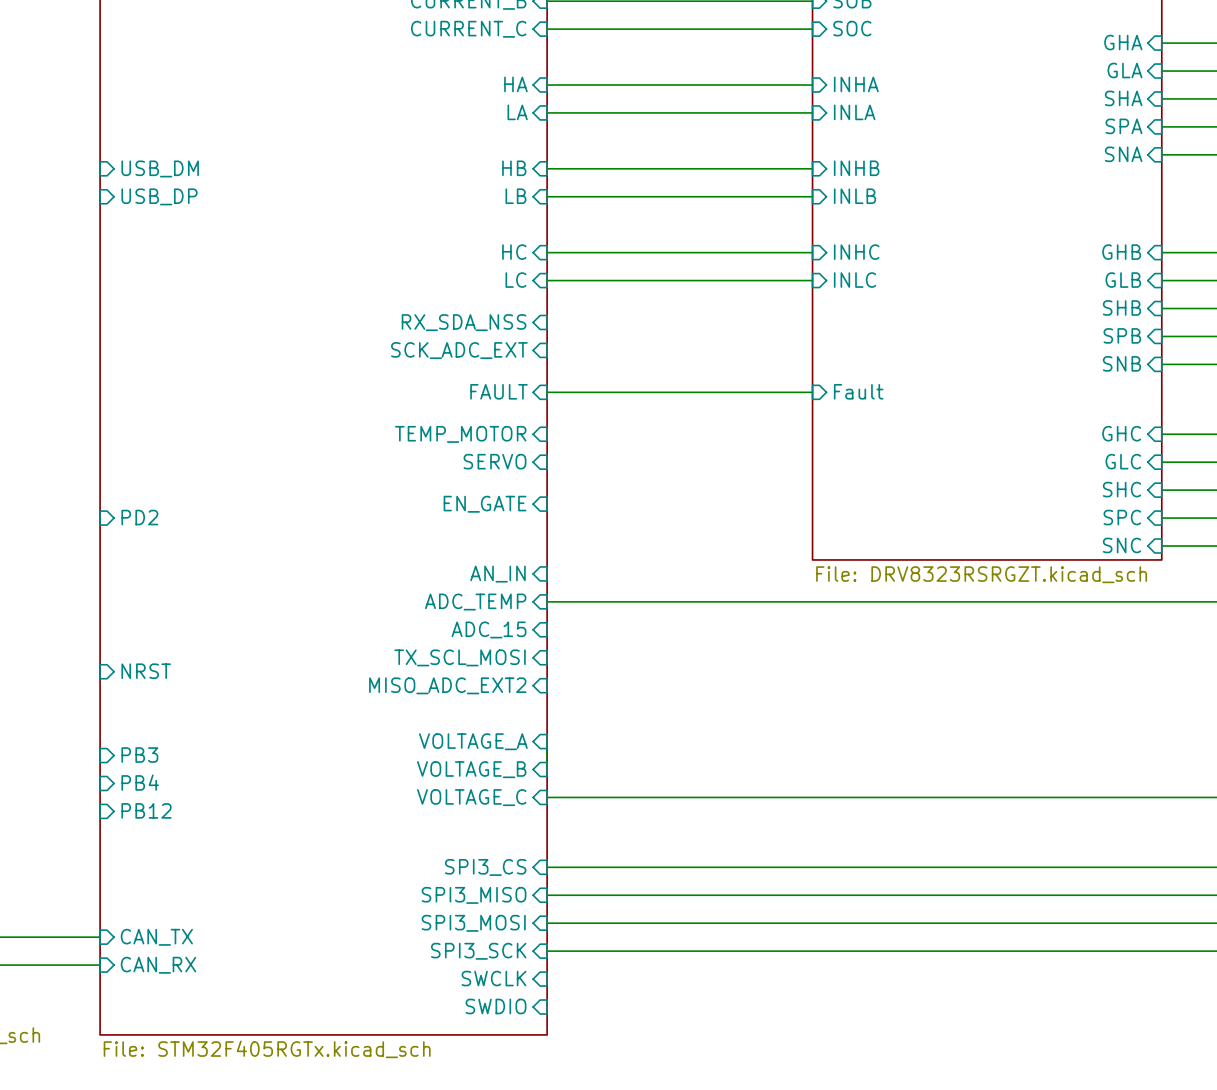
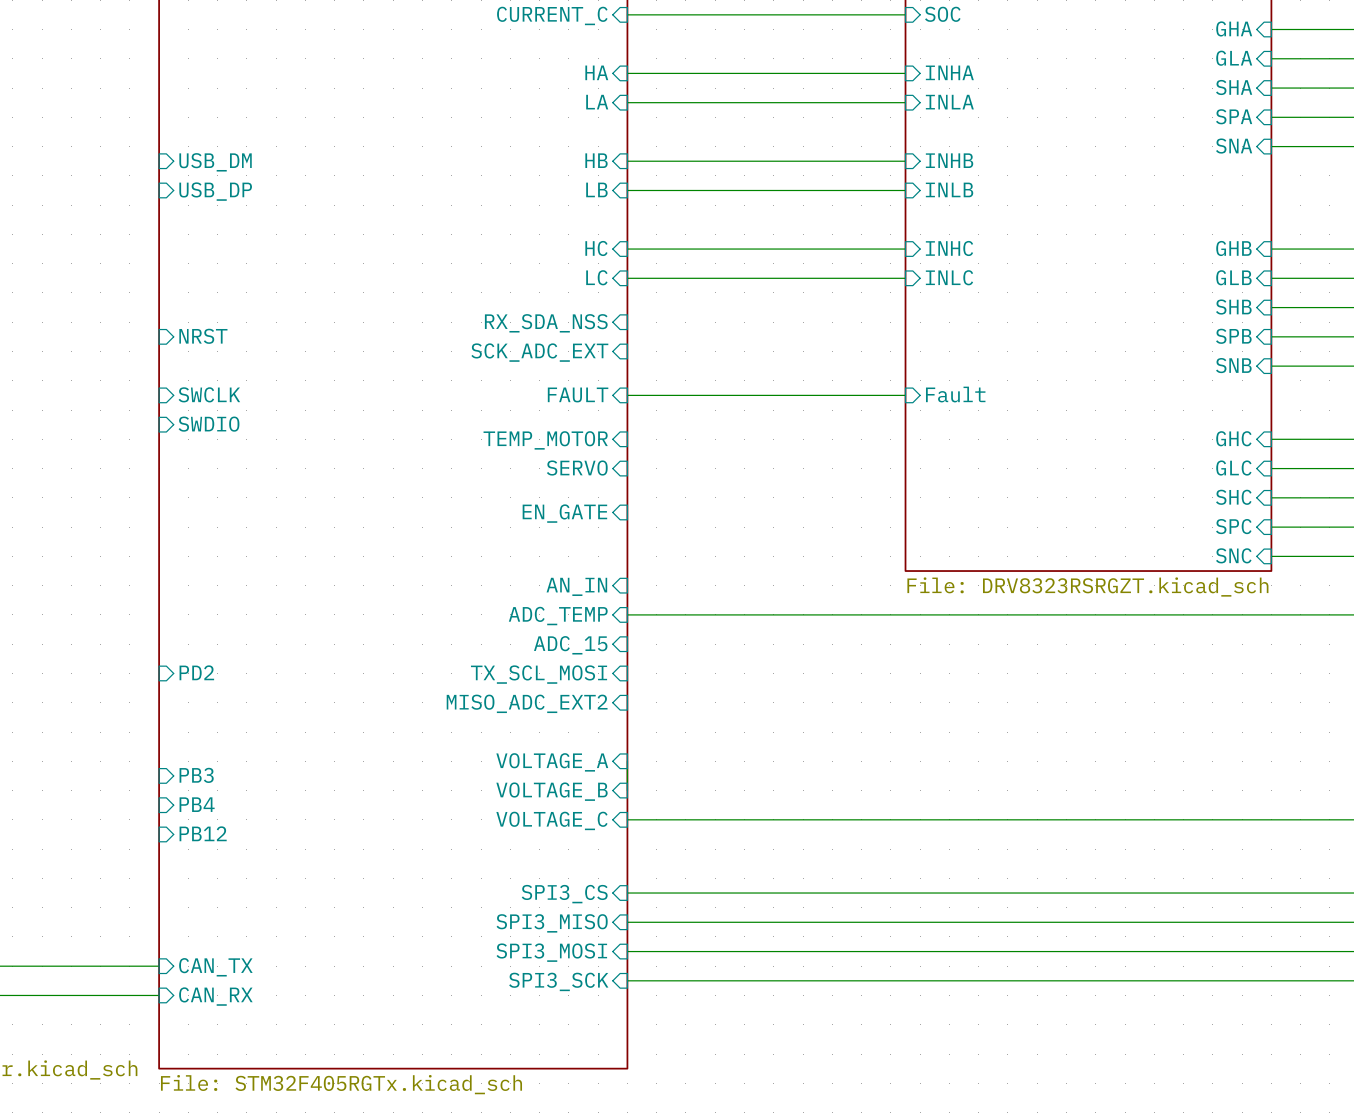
sheet pin: none -> NRST (203, 336)
sheet pin: none -> SWCLK (209, 394)
sheet pin: none -> SWDIO (209, 424)
sheet pin position: PD2 (139, 517) -> PD2 (196, 672)
sheet pin: NRST (146, 671) -> none
sheet pin: SWCLK (494, 978) -> none
sheet pin: SWDIO (496, 1006) -> none

